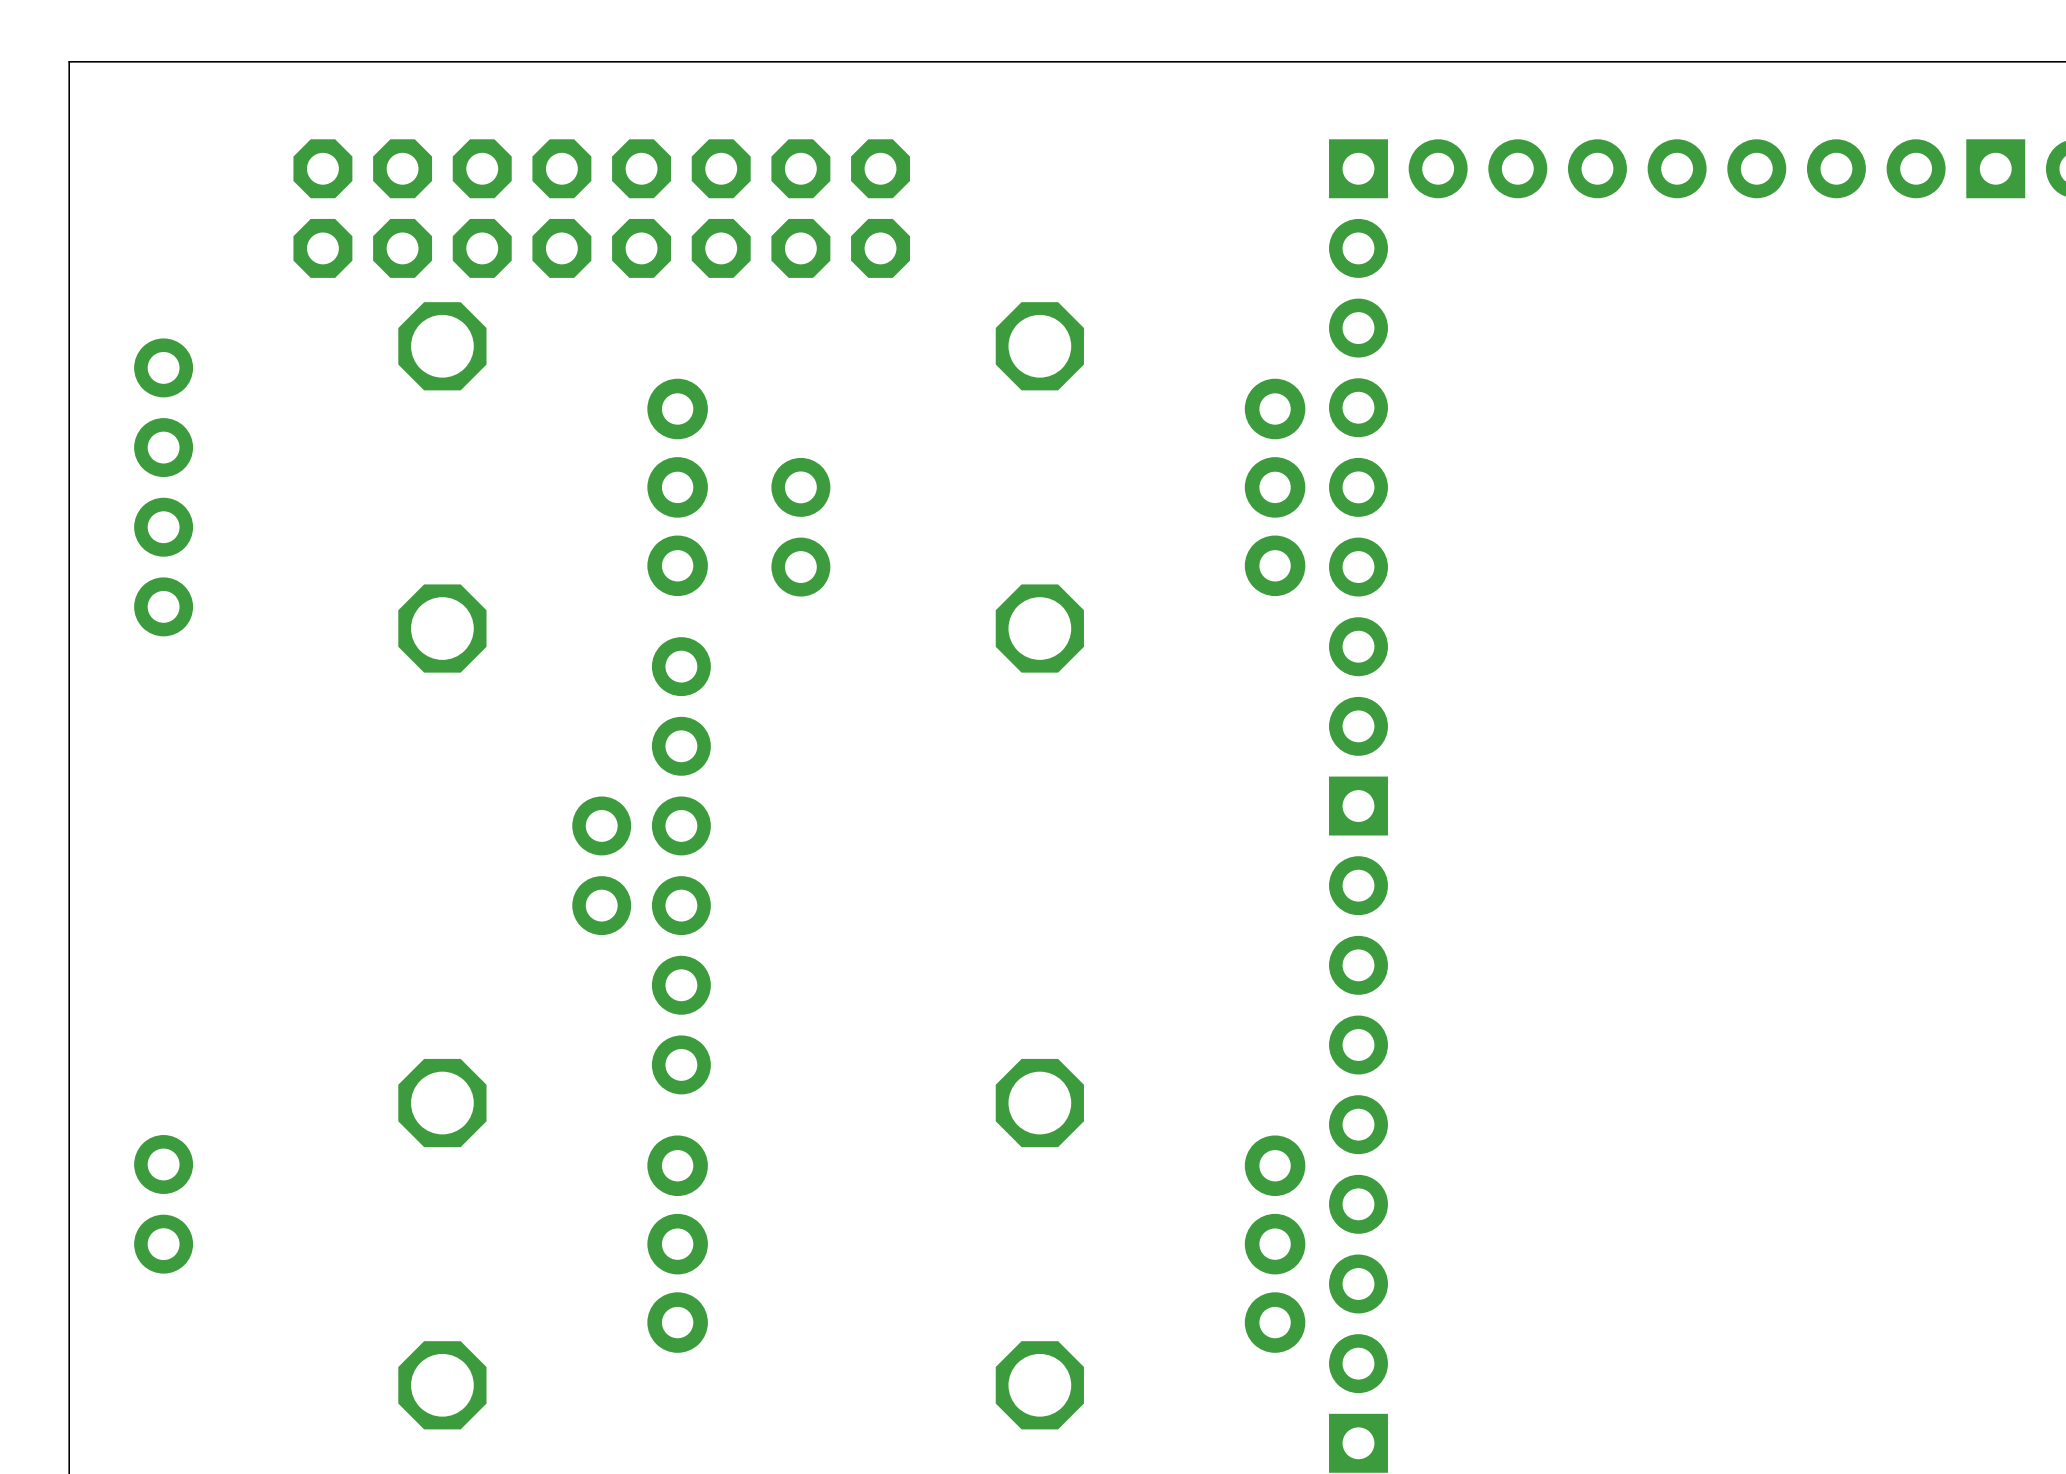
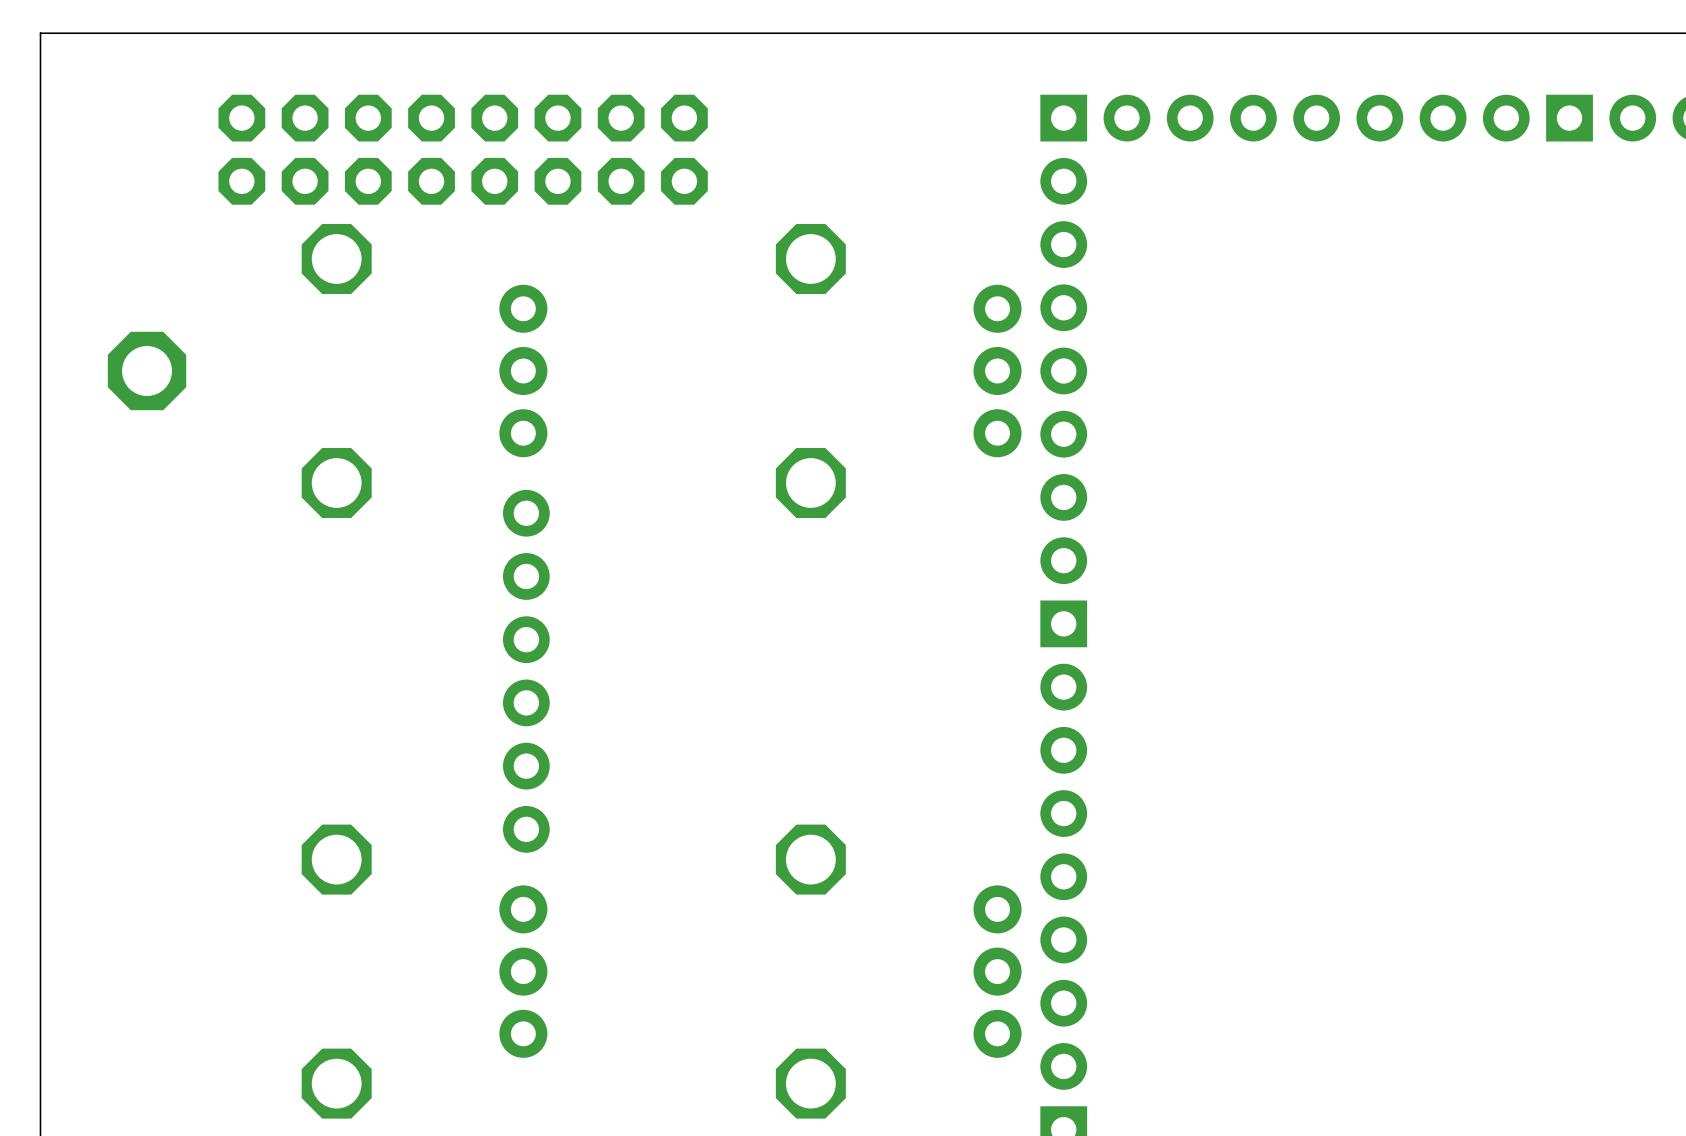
part: (163, 407) -> none
part: none -> (147, 370)
part: (800, 527) -> none
part: (163, 567) -> none
part: (601, 865) -> none
part: (163, 1204) -> none

